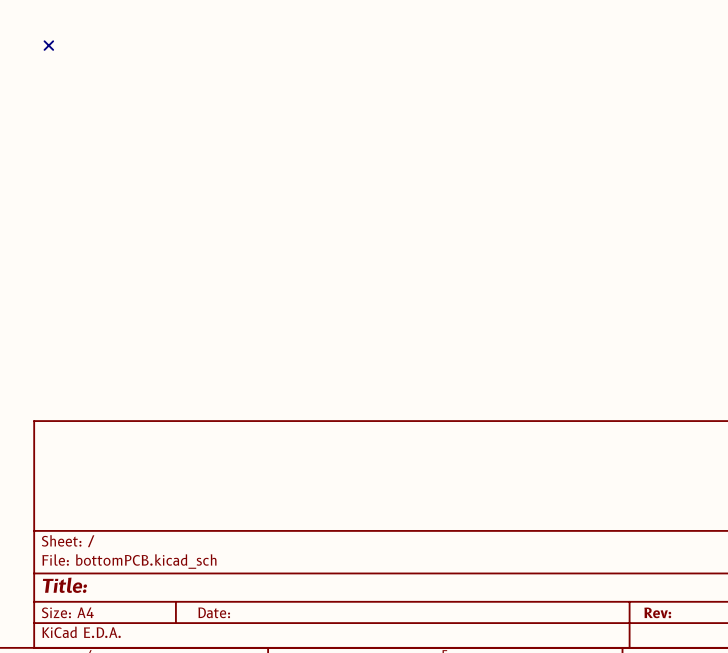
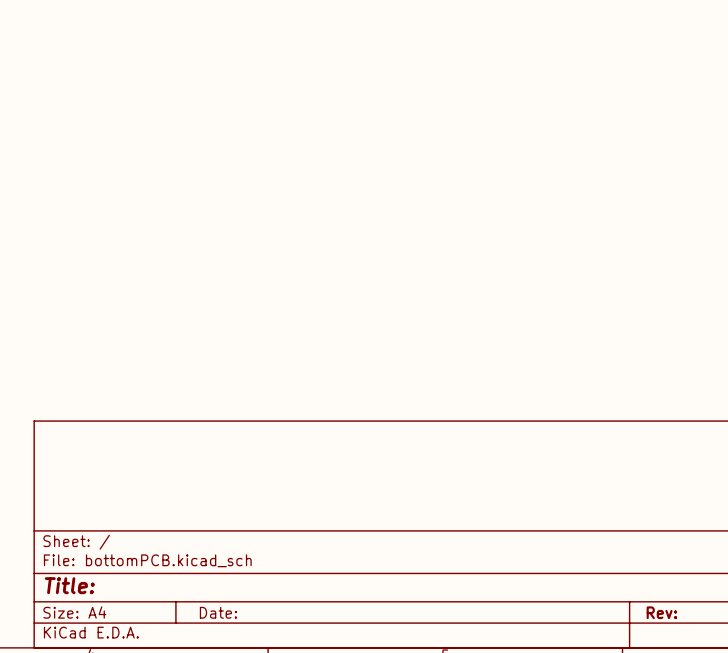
no-connect mark: (48, 45) -> none

